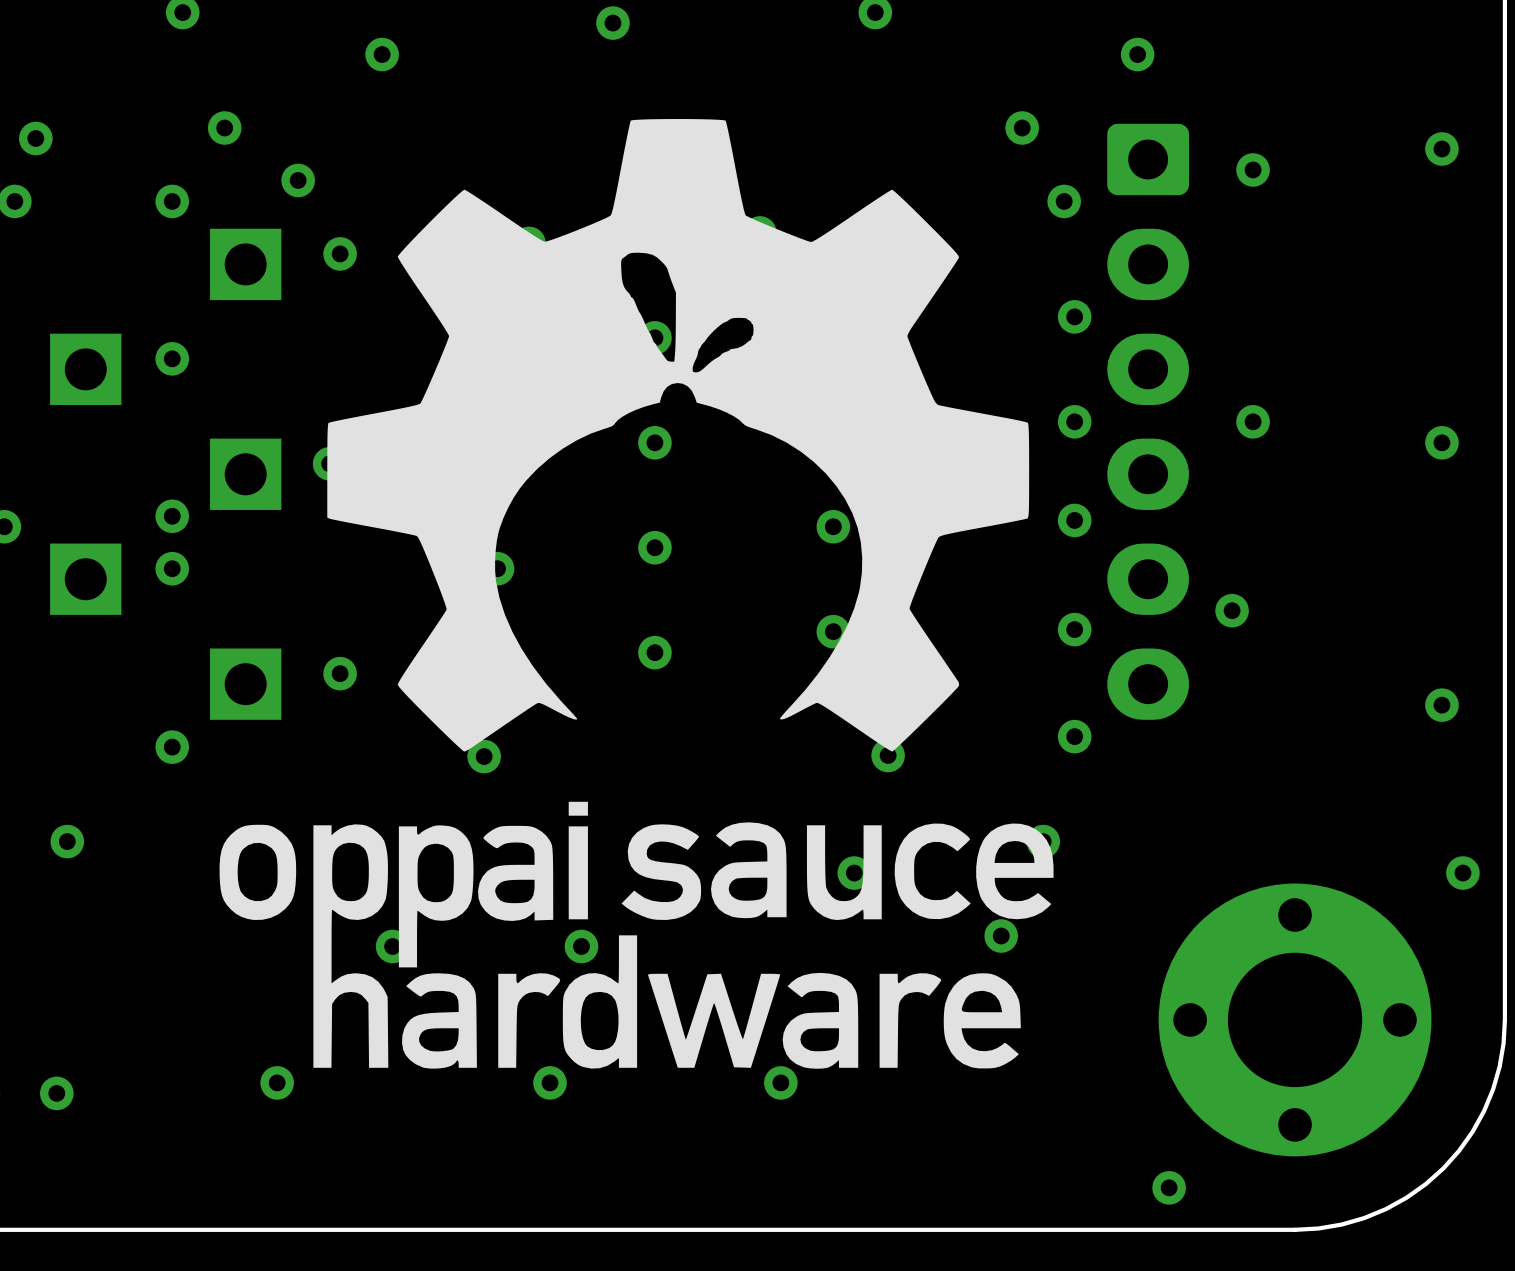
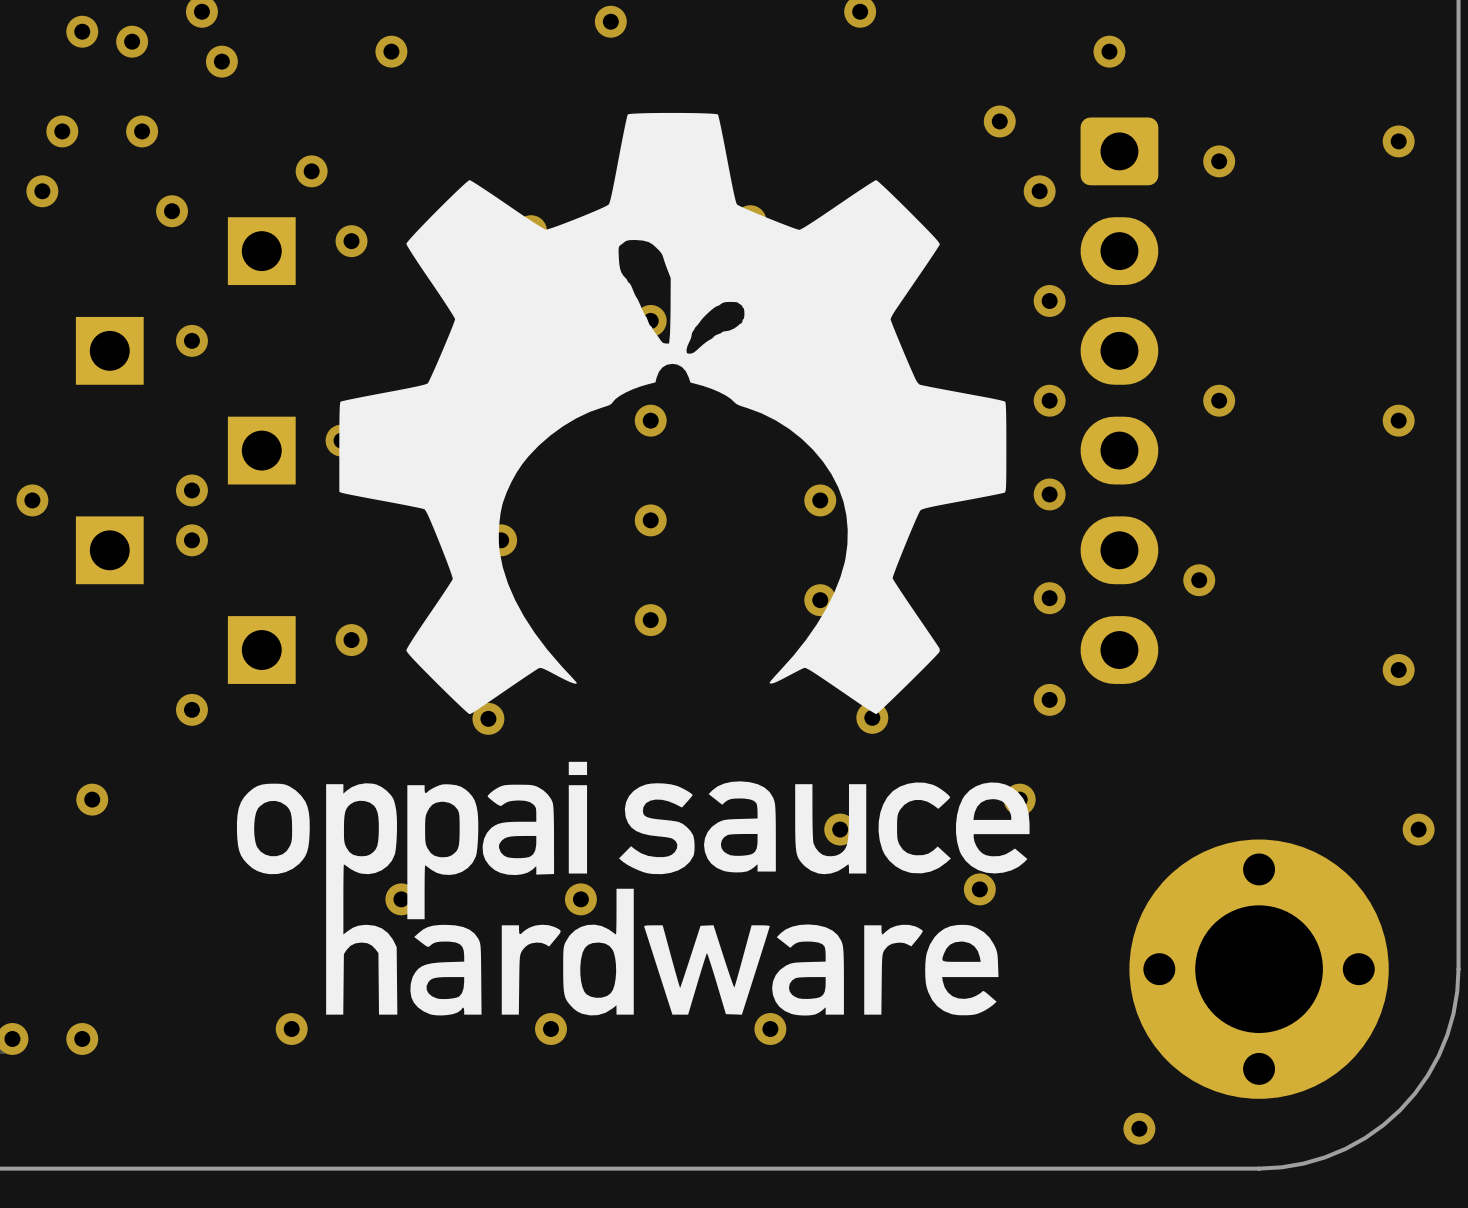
via: none -> (82, 31)
via: none -> (132, 41)
via: none -> (221, 61)
via: (224, 128) -> none
via: none -> (142, 131)
via position: (172, 201) -> (172, 211)

